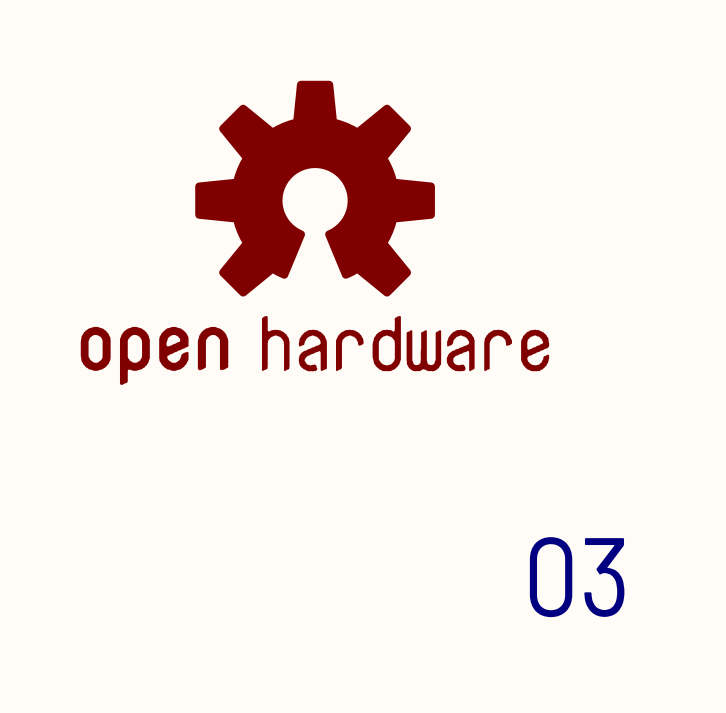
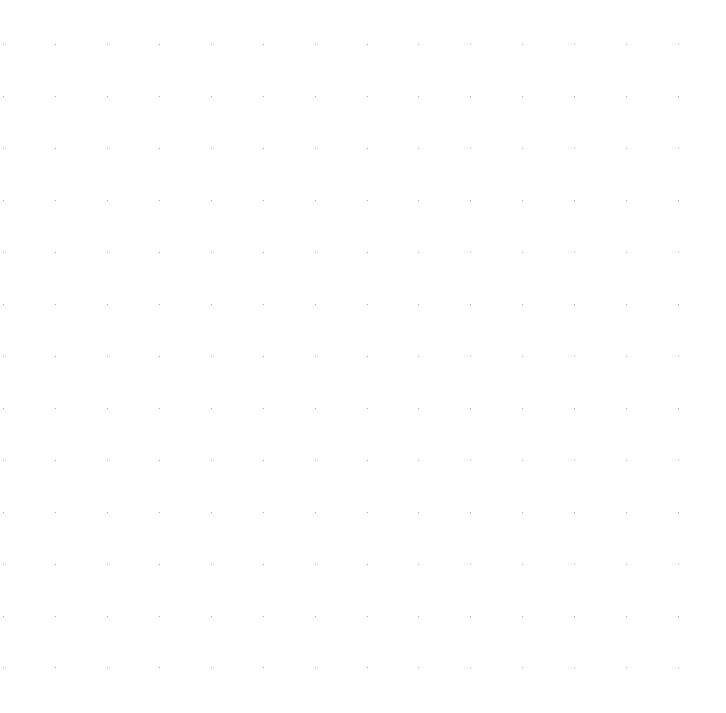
part: (314, 232) -> none
text: 03 (577, 577) -> none

